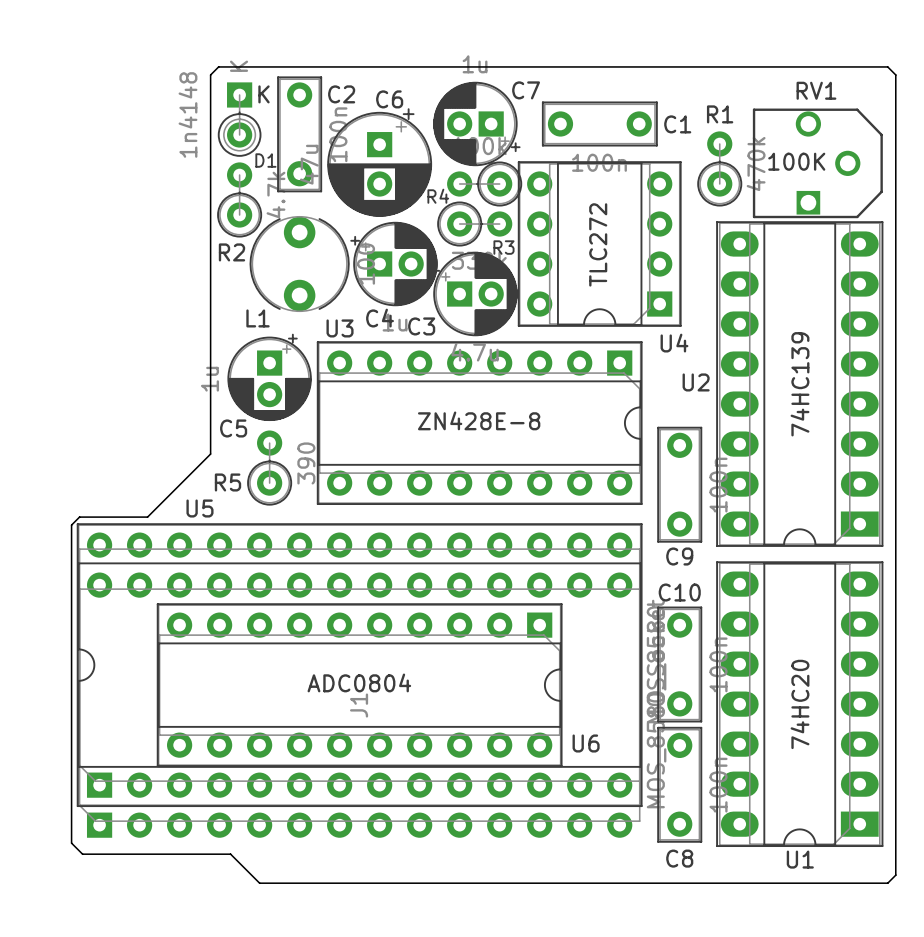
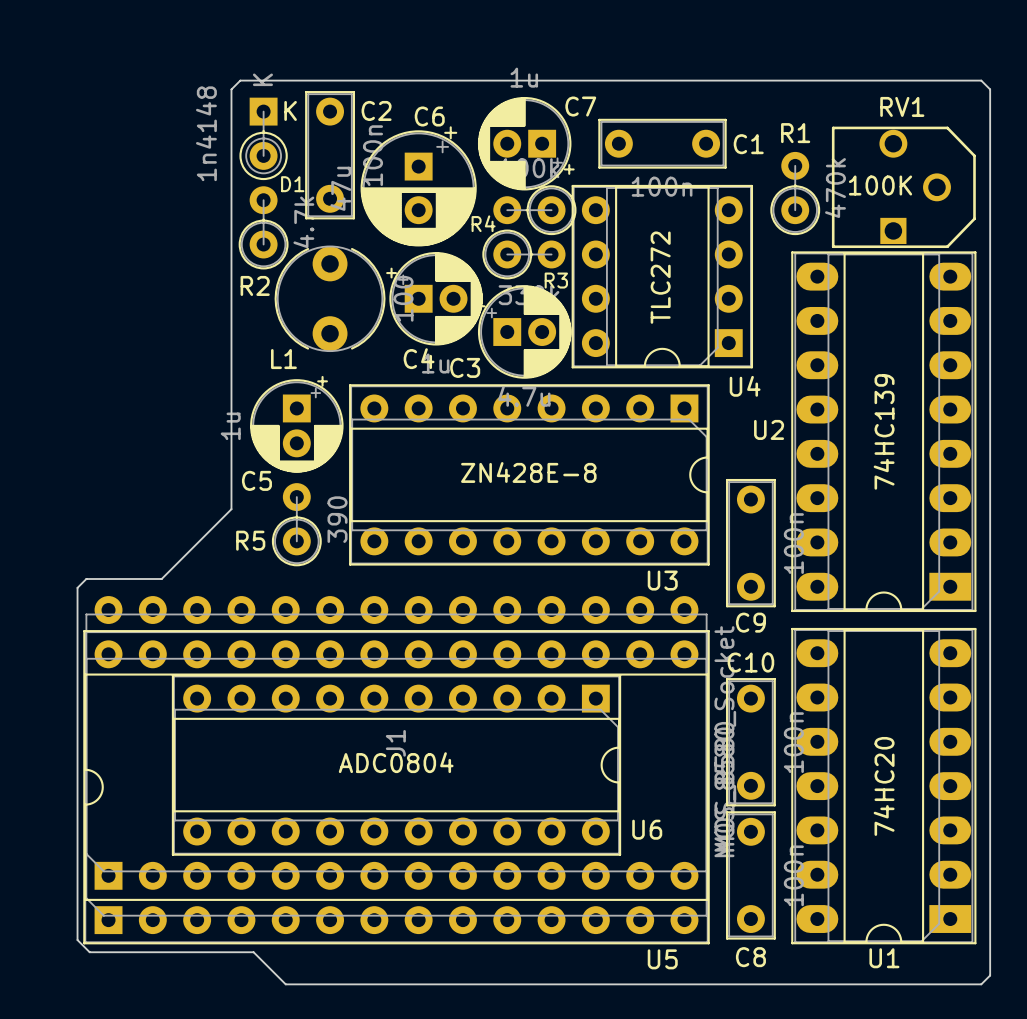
U3 name position: U3 (340, 328) -> U3 (662, 580)
U5 name position: U5 (199, 508) -> U5 (662, 959)
U5 position: (359, 665) -> (396, 787)
J1 position: (359, 705) -> (396, 742)

